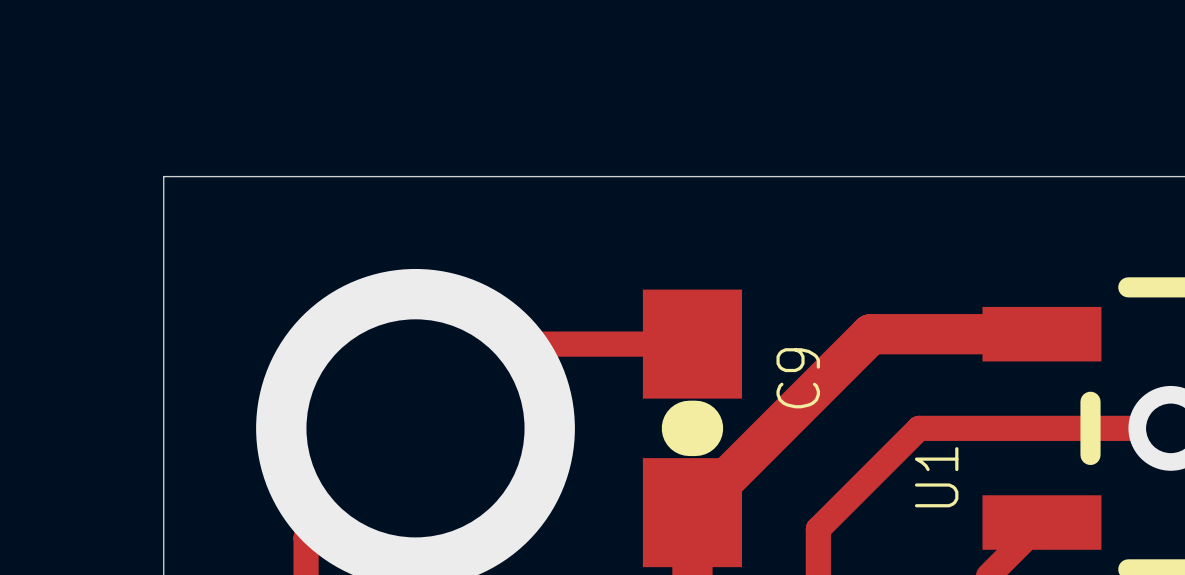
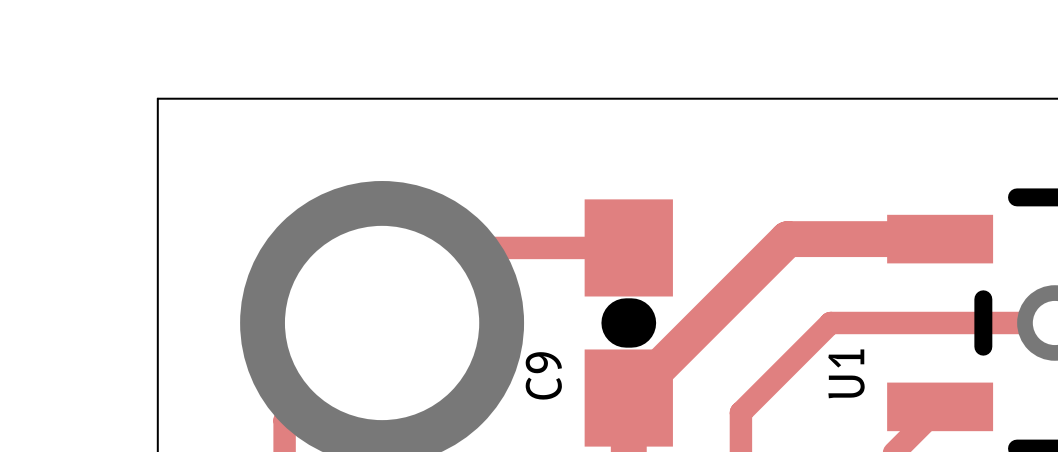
C9 name position: C9 (798, 378) -> C9 (543, 375)

